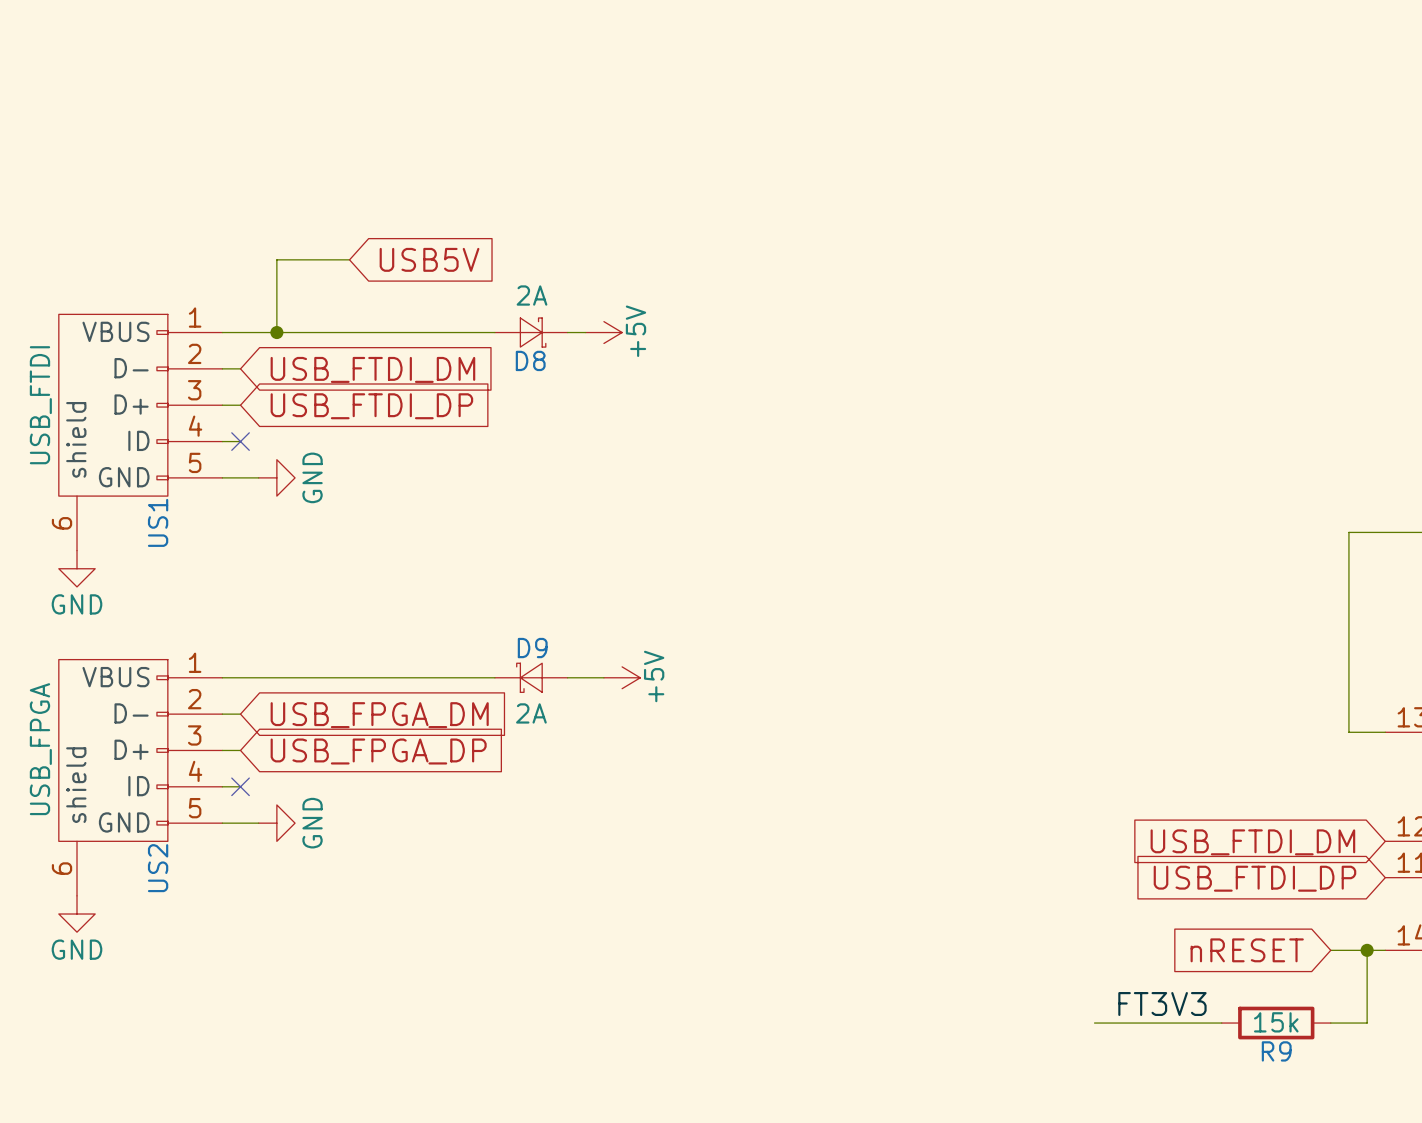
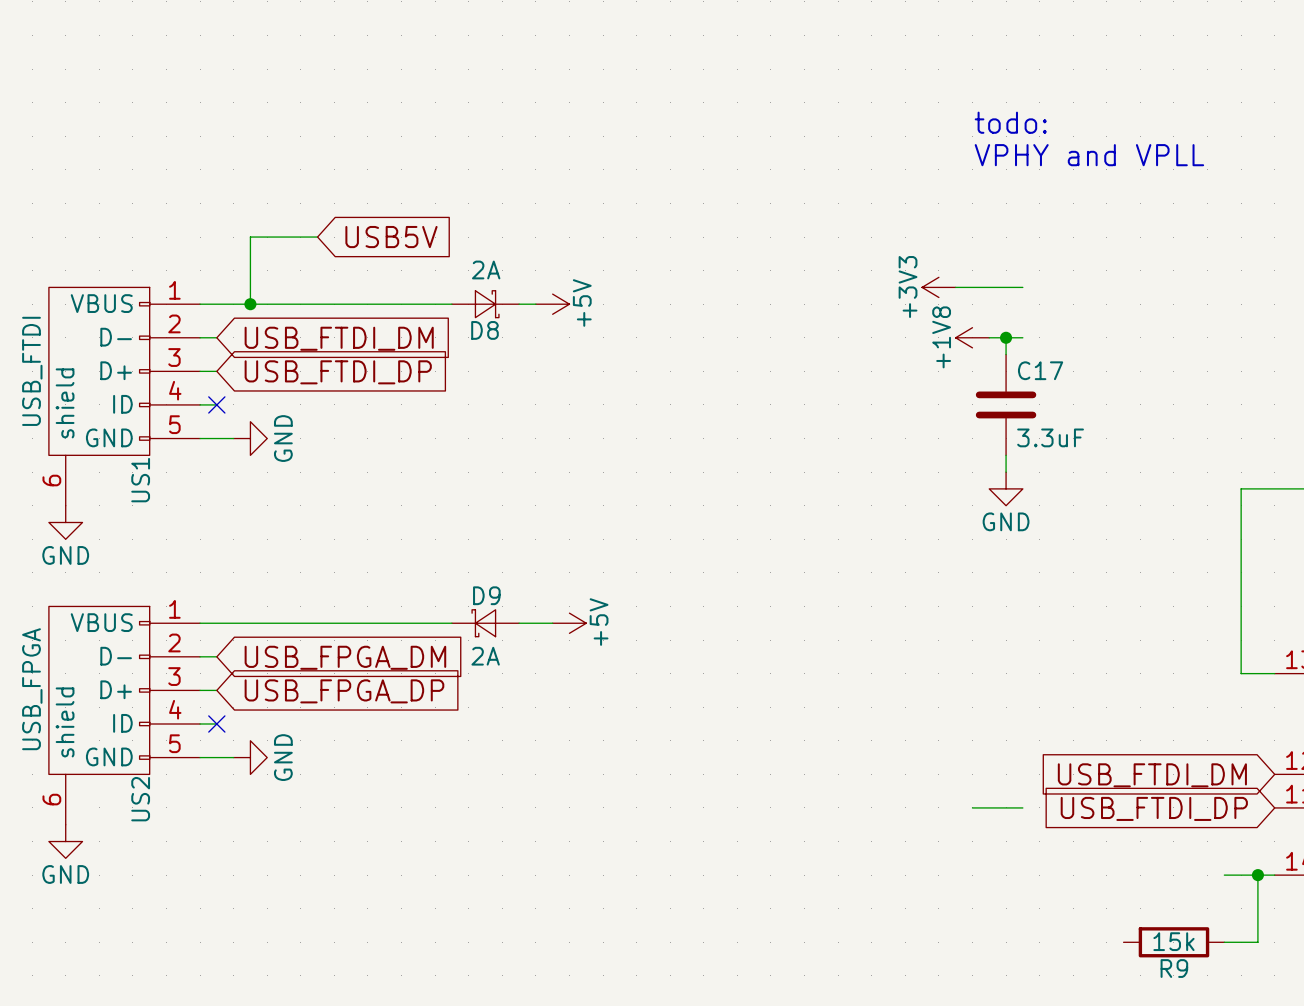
text: none -> todo: (1010, 122)
text: none -> VPHY and VPLL (1089, 155)
power symbol: none -> +3V3 (938, 287)
wire: none -> (955, 287) (1022, 287)
power symbol: none -> +1V8 (972, 337)
wire: none -> (989, 337) (1022, 337)
wire: none -> (1006, 337) (1006, 354)
junction: none -> (1006, 337)
C17: none -> 3.3uF (1006, 404)
wire: none -> (1006, 455) (1006, 472)
power symbol: none -> GND (1006, 488)
wire: none -> (972, 807) (1022, 807)
global label: nRESET (1247, 950) -> none
label: FT3V3 (1162, 1004) -> none
wire: (1094, 1023) (1221, 1023) -> none

